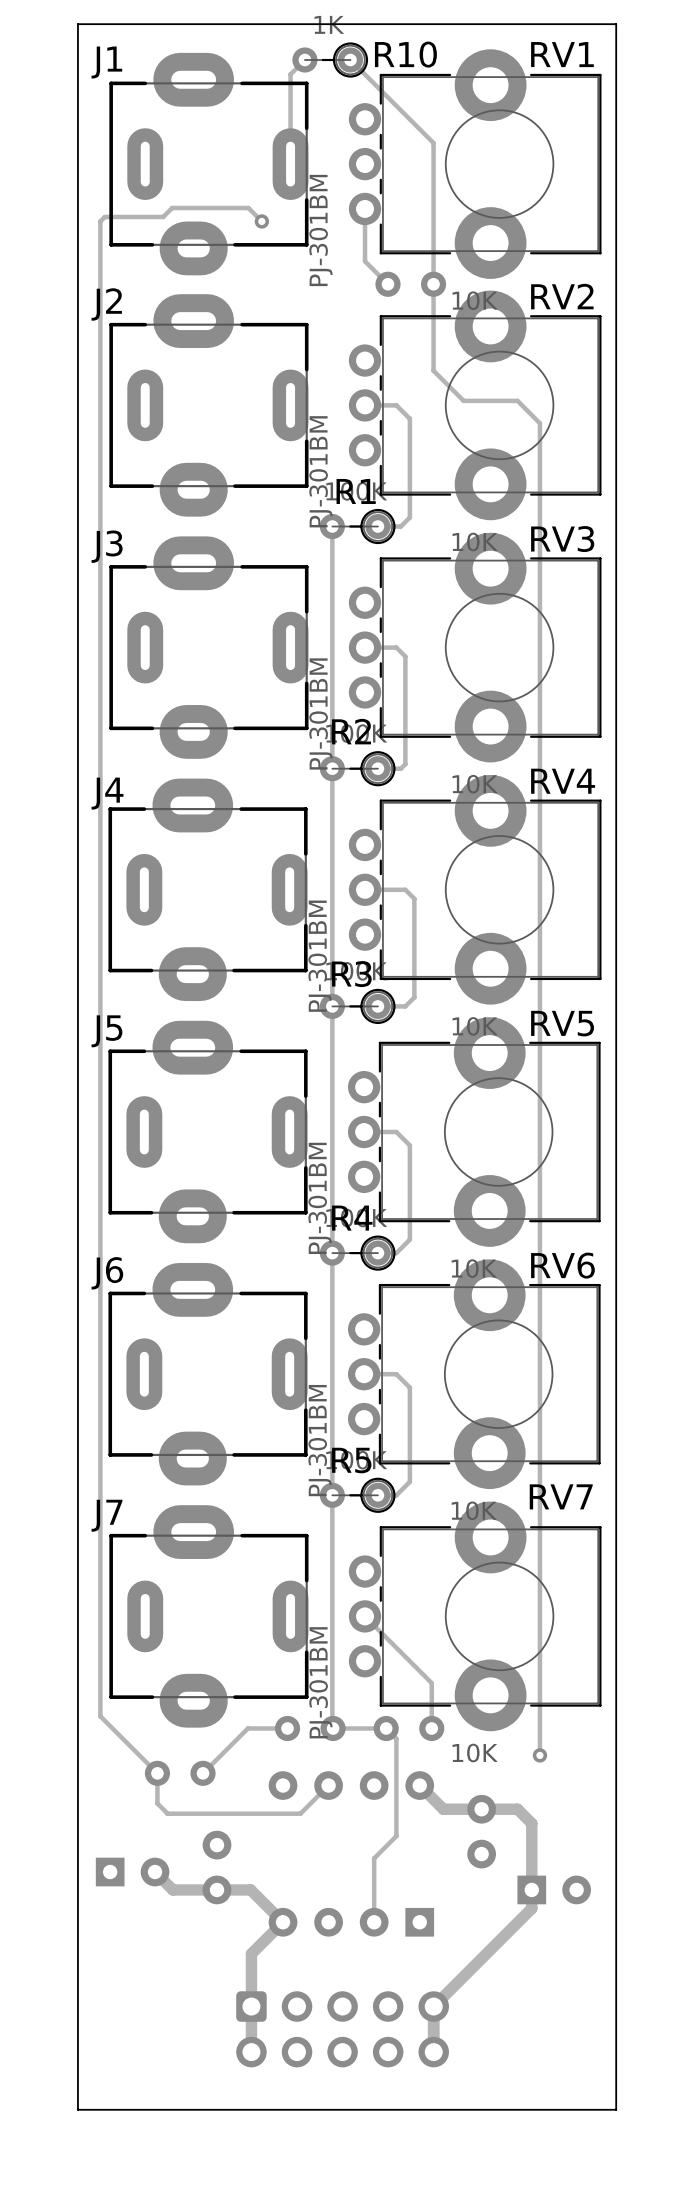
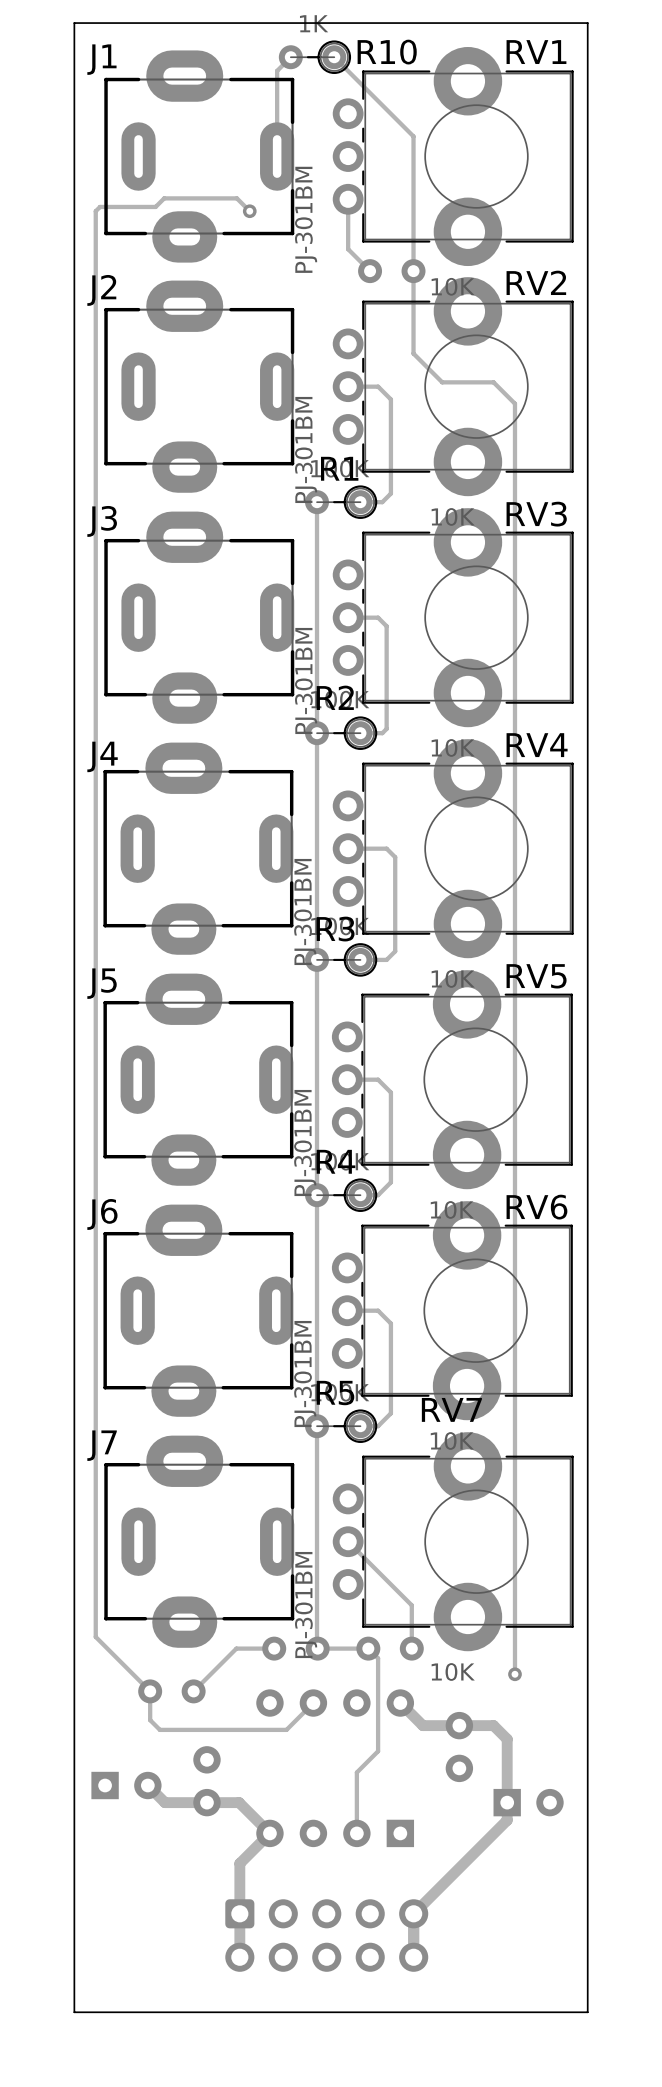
RV7 name position: RV7 (561, 1496) -> RV7 (451, 1409)

